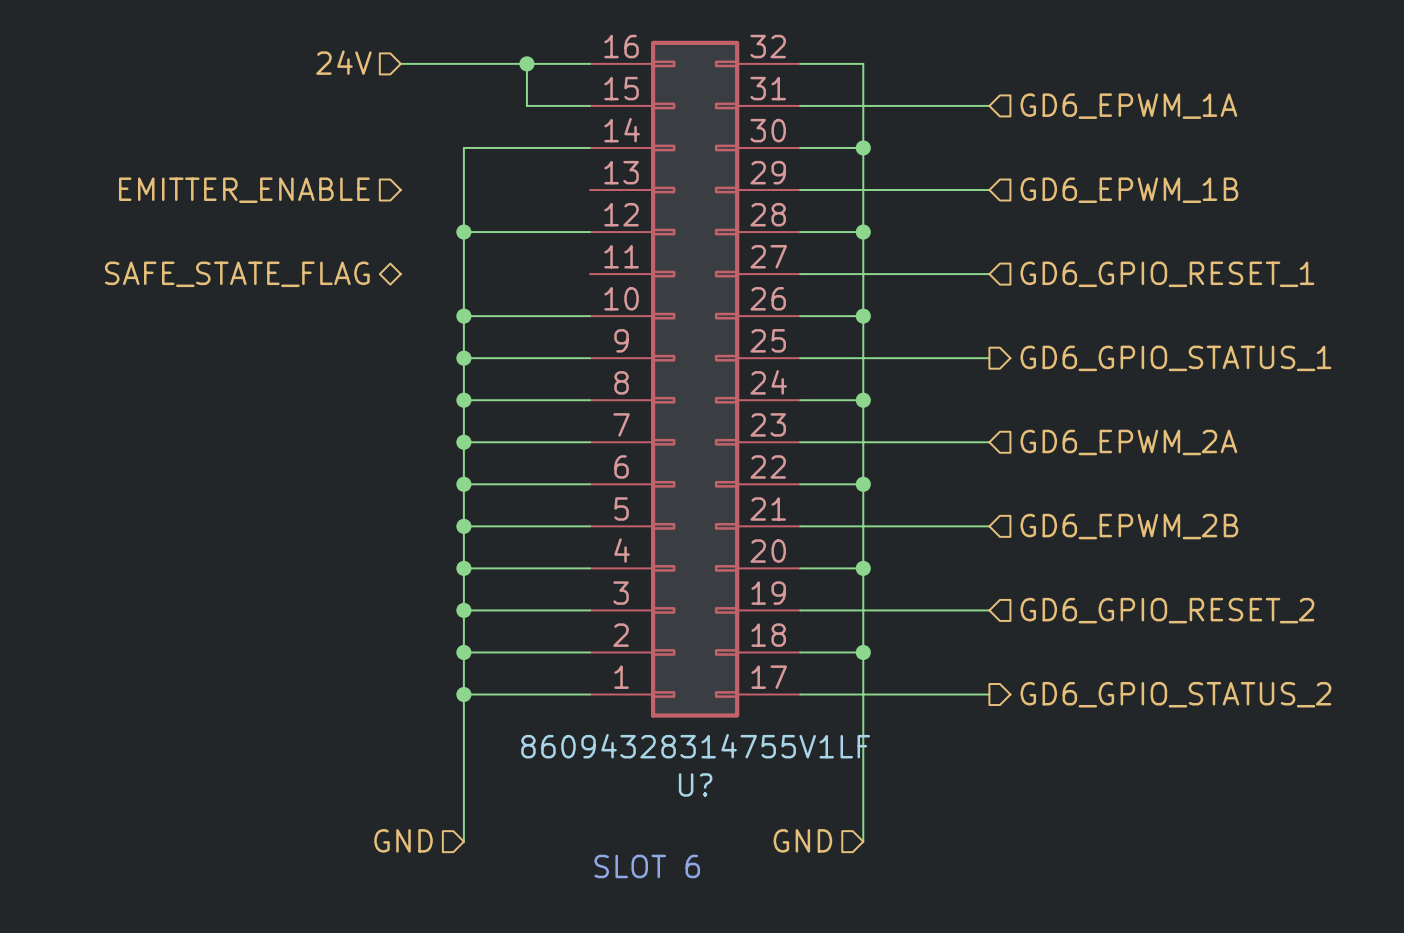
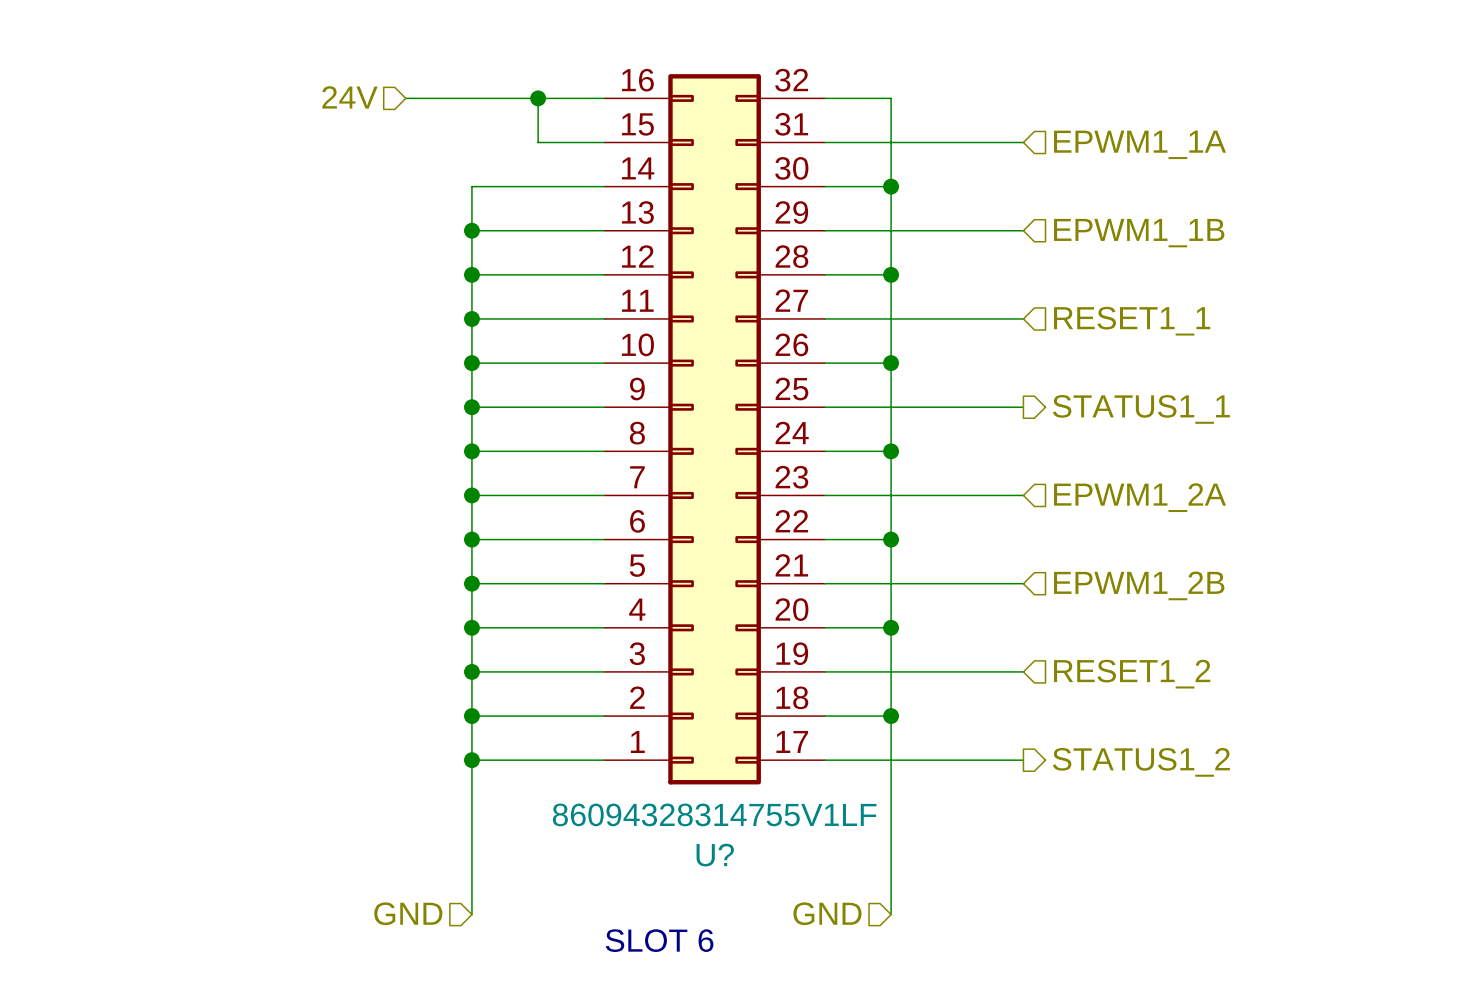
hierarchical label: GD6_EPWM_1A (1128, 106) -> EPWM1_1A (1140, 144)
hierarchical label: EMITTER_ENABLE (244, 190) -> none
wire: none -> (471, 230) (604, 230)
junction: none -> (471, 230)
hierarchical label: GD6_EPWM_1B (1129, 190) -> EPWM1_1B (1139, 233)
hierarchical label: SAFE_STATE_FLAG (237, 274) -> none
wire: none -> (471, 318) (604, 318)
junction: none -> (471, 318)
hierarchical label: GD6_GPIO_RESET_1 (1167, 274) -> RESET1_1 (1132, 321)
hierarchical label: GD6_GPIO_STATUS_1 (1175, 358) -> STATUS1_1 (1141, 409)
hierarchical label: GD6_EPWM_2A (1128, 442) -> EPWM1_2A (1140, 497)
hierarchical label: GD6_EPWM_2B (1129, 526) -> EPWM1_2B (1139, 585)
hierarchical label: GD6_GPIO_RESET_2 (1167, 610) -> RESET1_2 (1132, 674)
hierarchical label: GD6_GPIO_STATUS_2 (1175, 694) -> STATUS1_2 (1141, 762)

